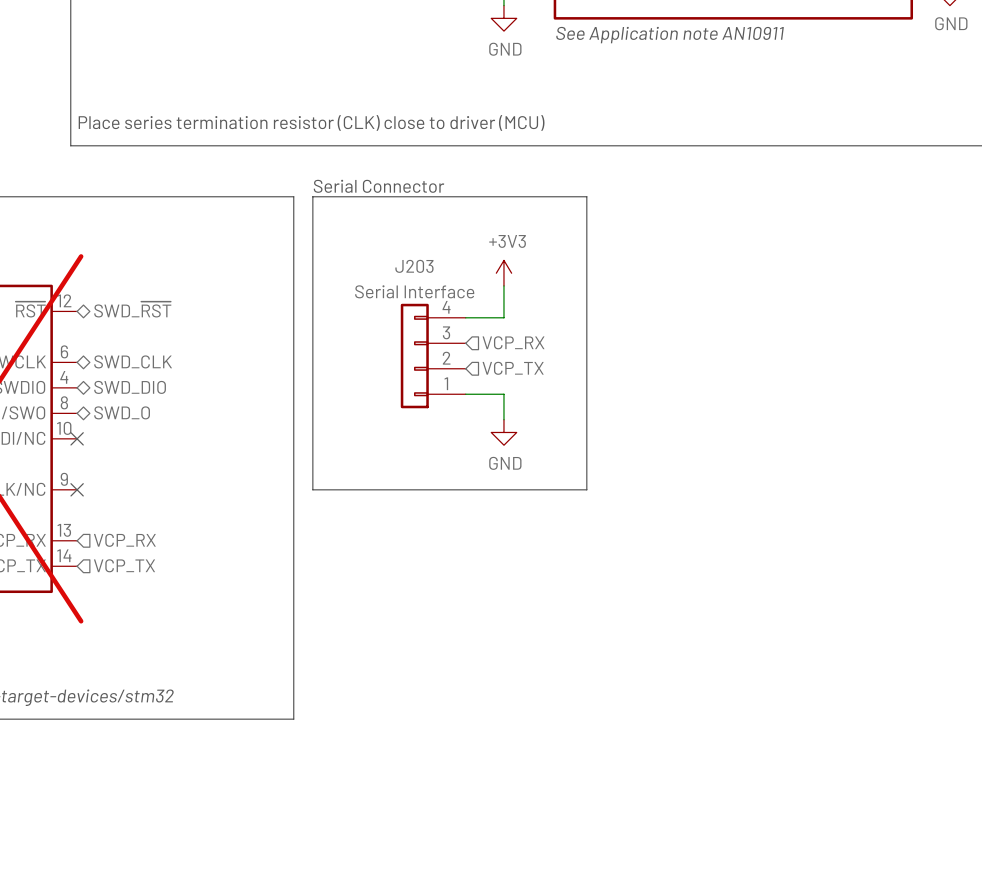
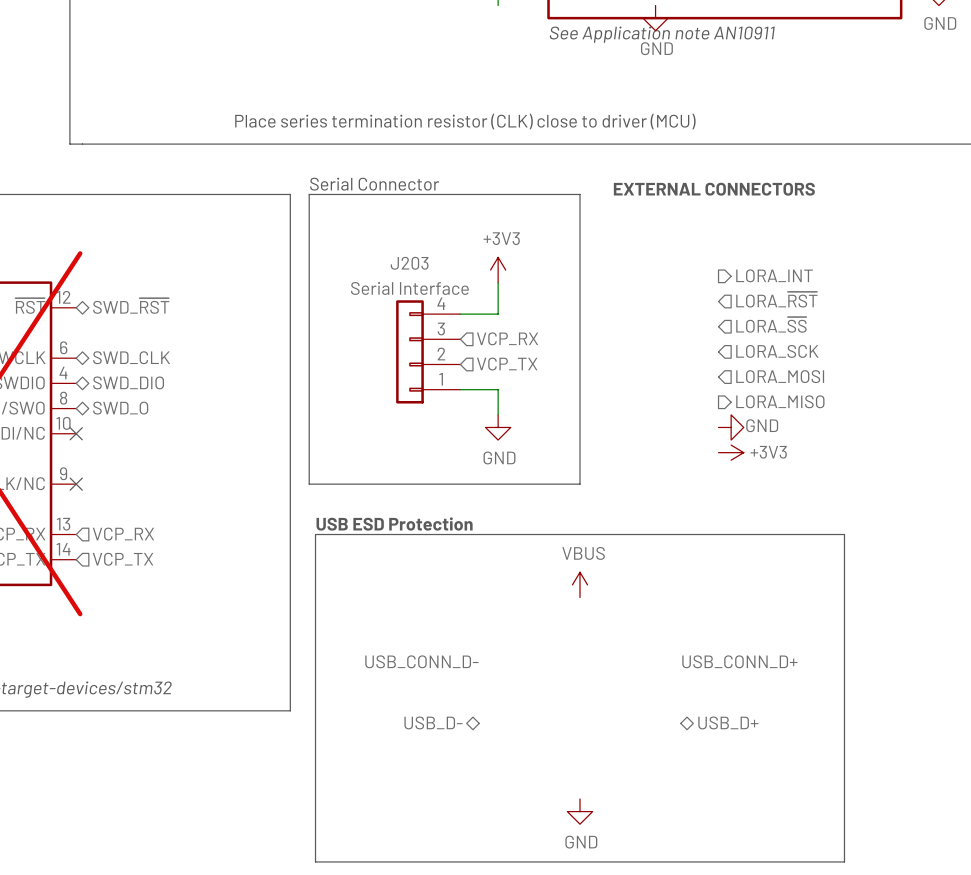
power symbol position: GND (503, 18) -> GND (655, 18)
text position: Place series termination resistor (CLK) close to driver (MCU) (311, 122) -> Place series termination resistor (CLK) close to driver (MCU) (465, 121)
text: none -> EXTERNAL CONNECTORS (714, 189)
hierarchical label: none -> LORA_INT (774, 275)
hierarchical label: none -> LORA_~{RST} (776, 299)
hierarchical label: none -> LORA_~{SS} (771, 324)
hierarchical label: none -> LORA_SCK (777, 351)
hierarchical label: none -> LORA_MOSI (780, 376)
hierarchical label: none -> LORA_MISO (780, 401)
power symbol: none -> GND (731, 427)
power symbol: none -> +3V3 (731, 452)
text: none -> USB ESD Protection (394, 524)
line: none -> (315, 534) (844, 534) (844, 861) (315, 861) (315, 534)
power symbol: none -> VBUS (580, 584)
label: none -> USB_CONN_D- (421, 661)
label: none -> USB_CONN_D+ (739, 661)
hierarchical label: none -> USB_D- (433, 722)
hierarchical label: none -> USB_D+ (728, 722)
power symbol: none -> GND (580, 811)

